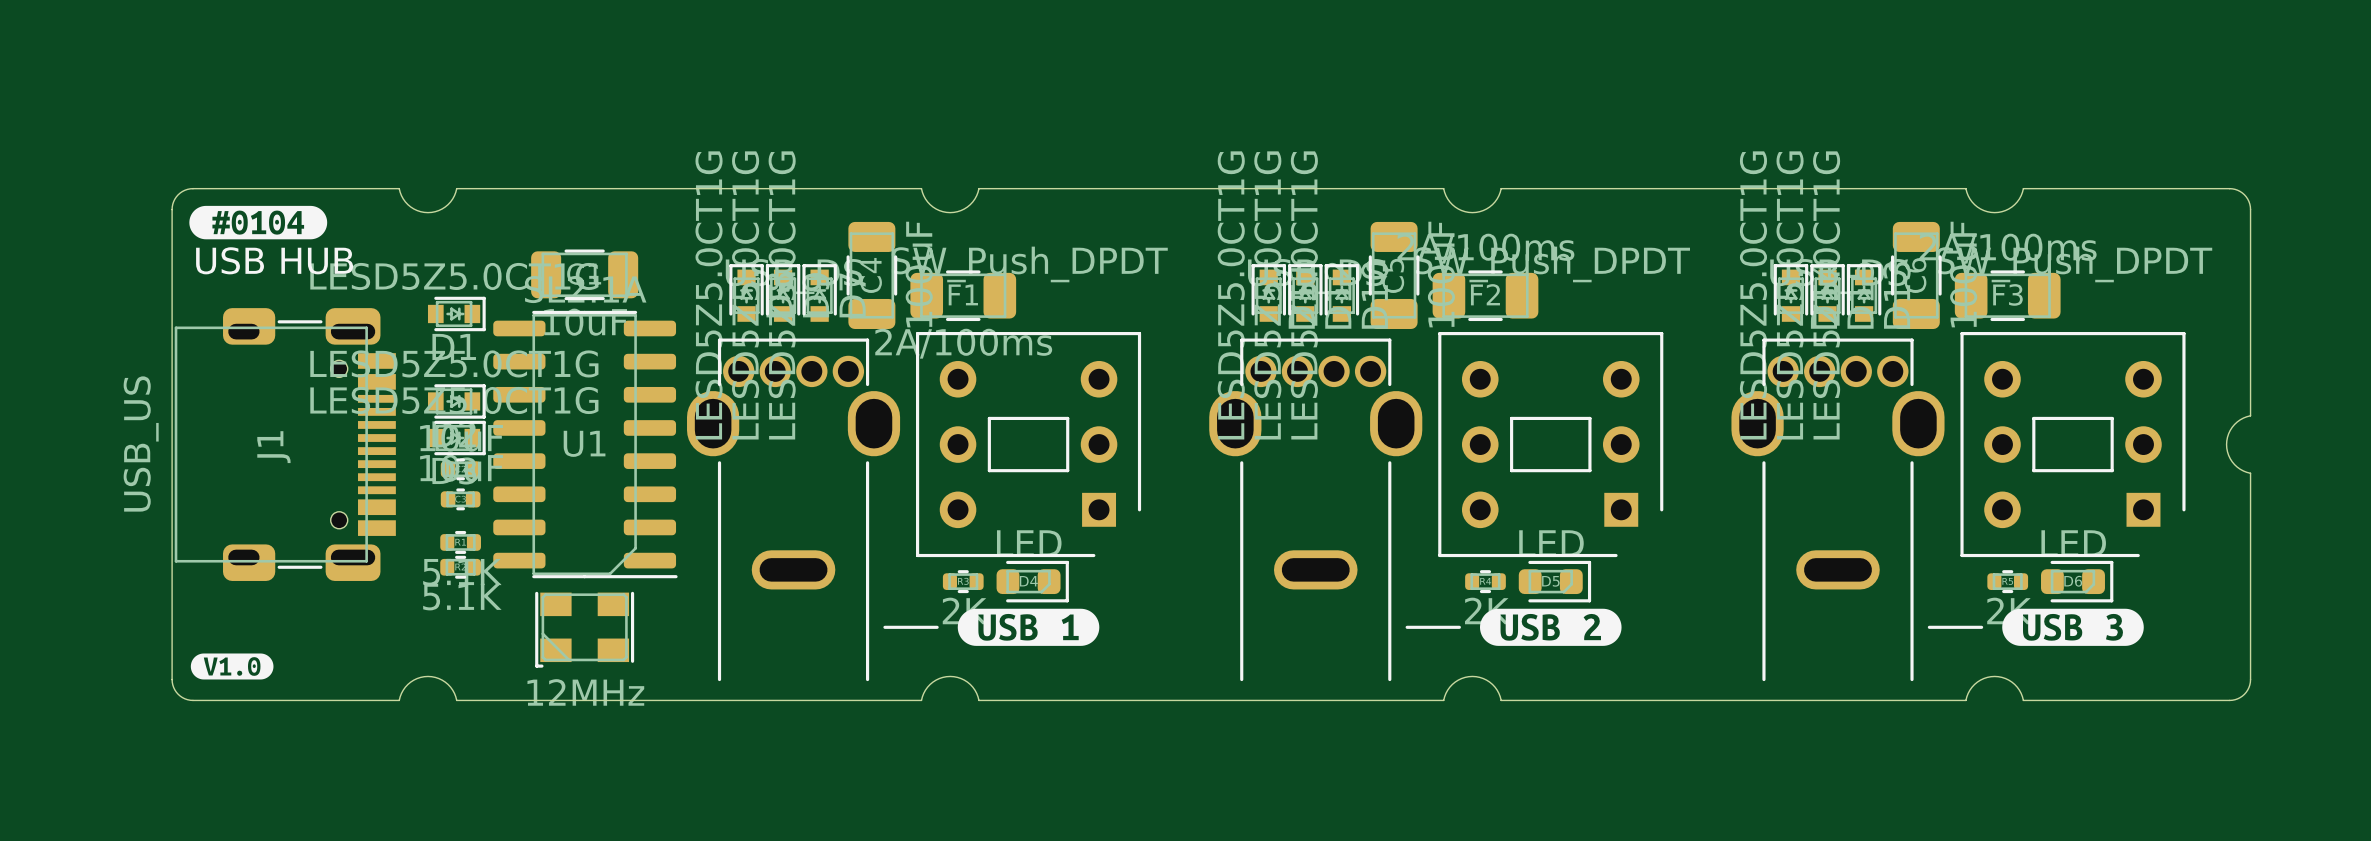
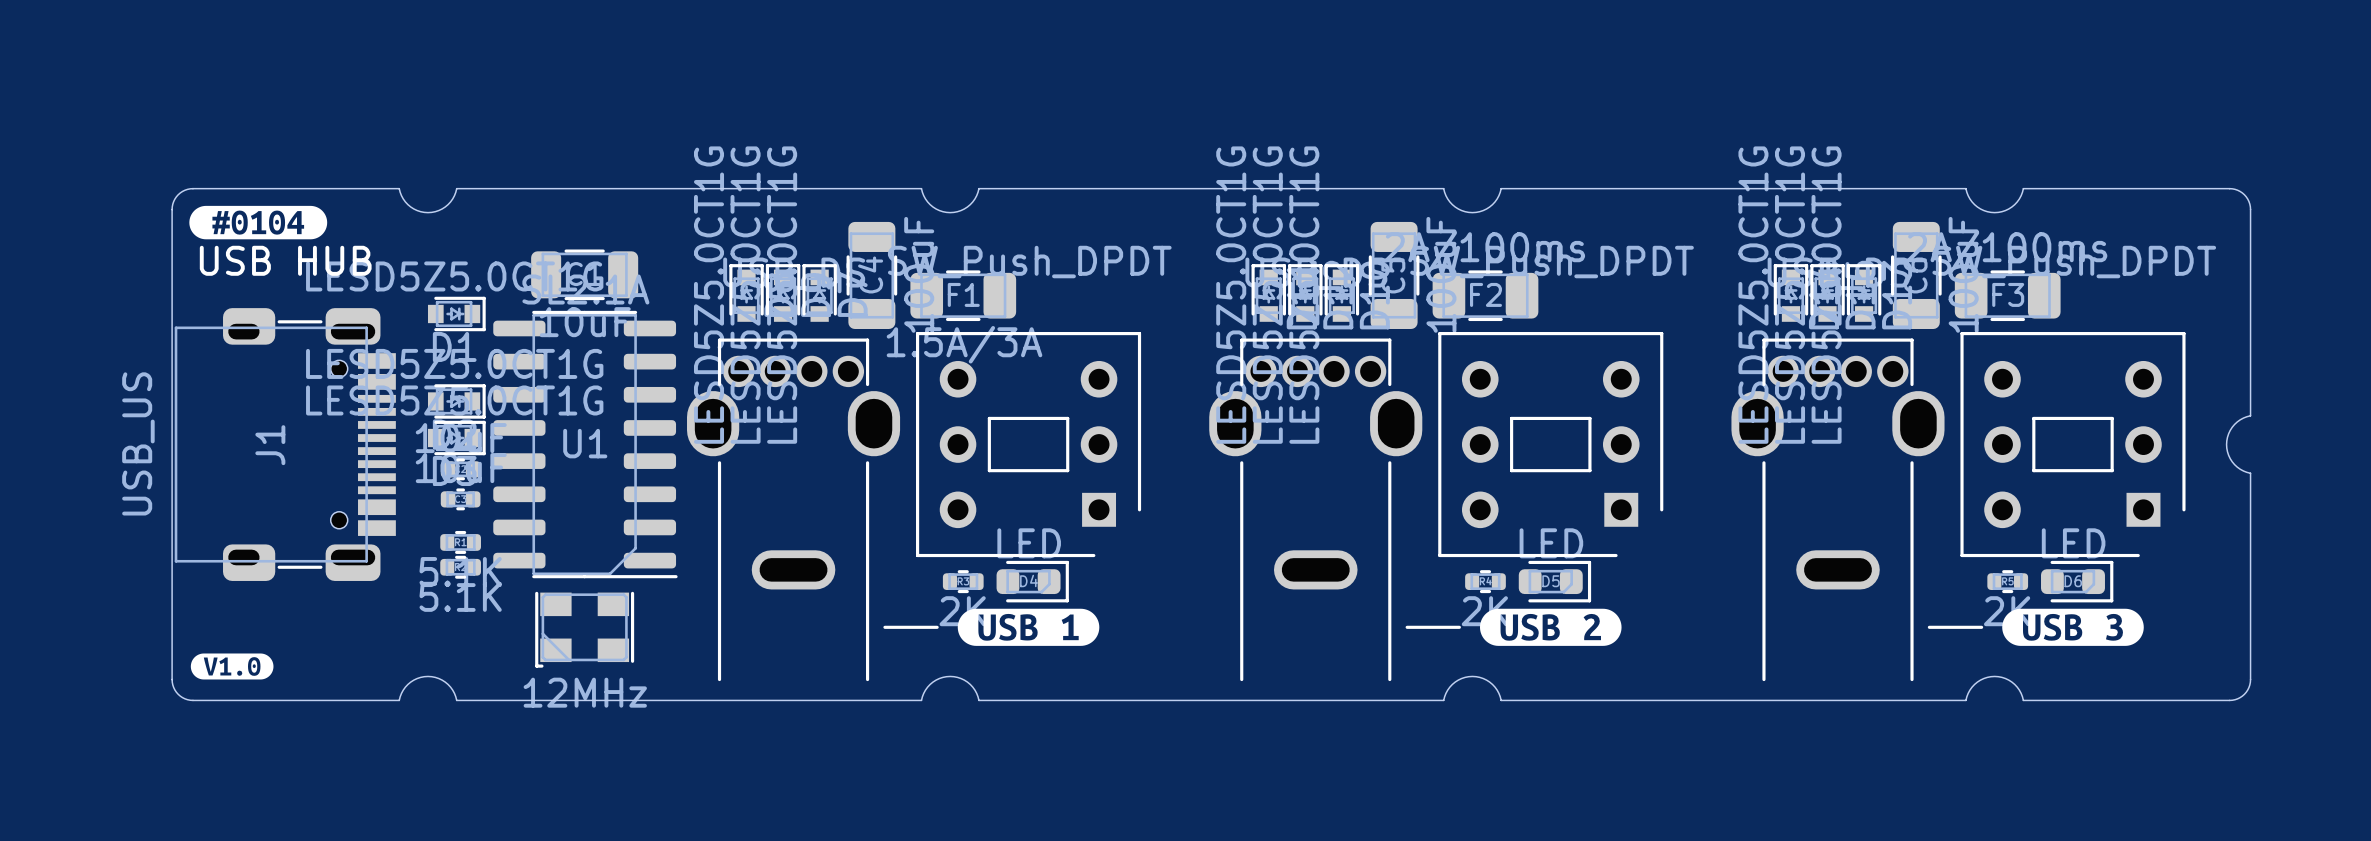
F1 value: 2A/100ms (963, 343) -> 1.5A/3A (964, 344)

